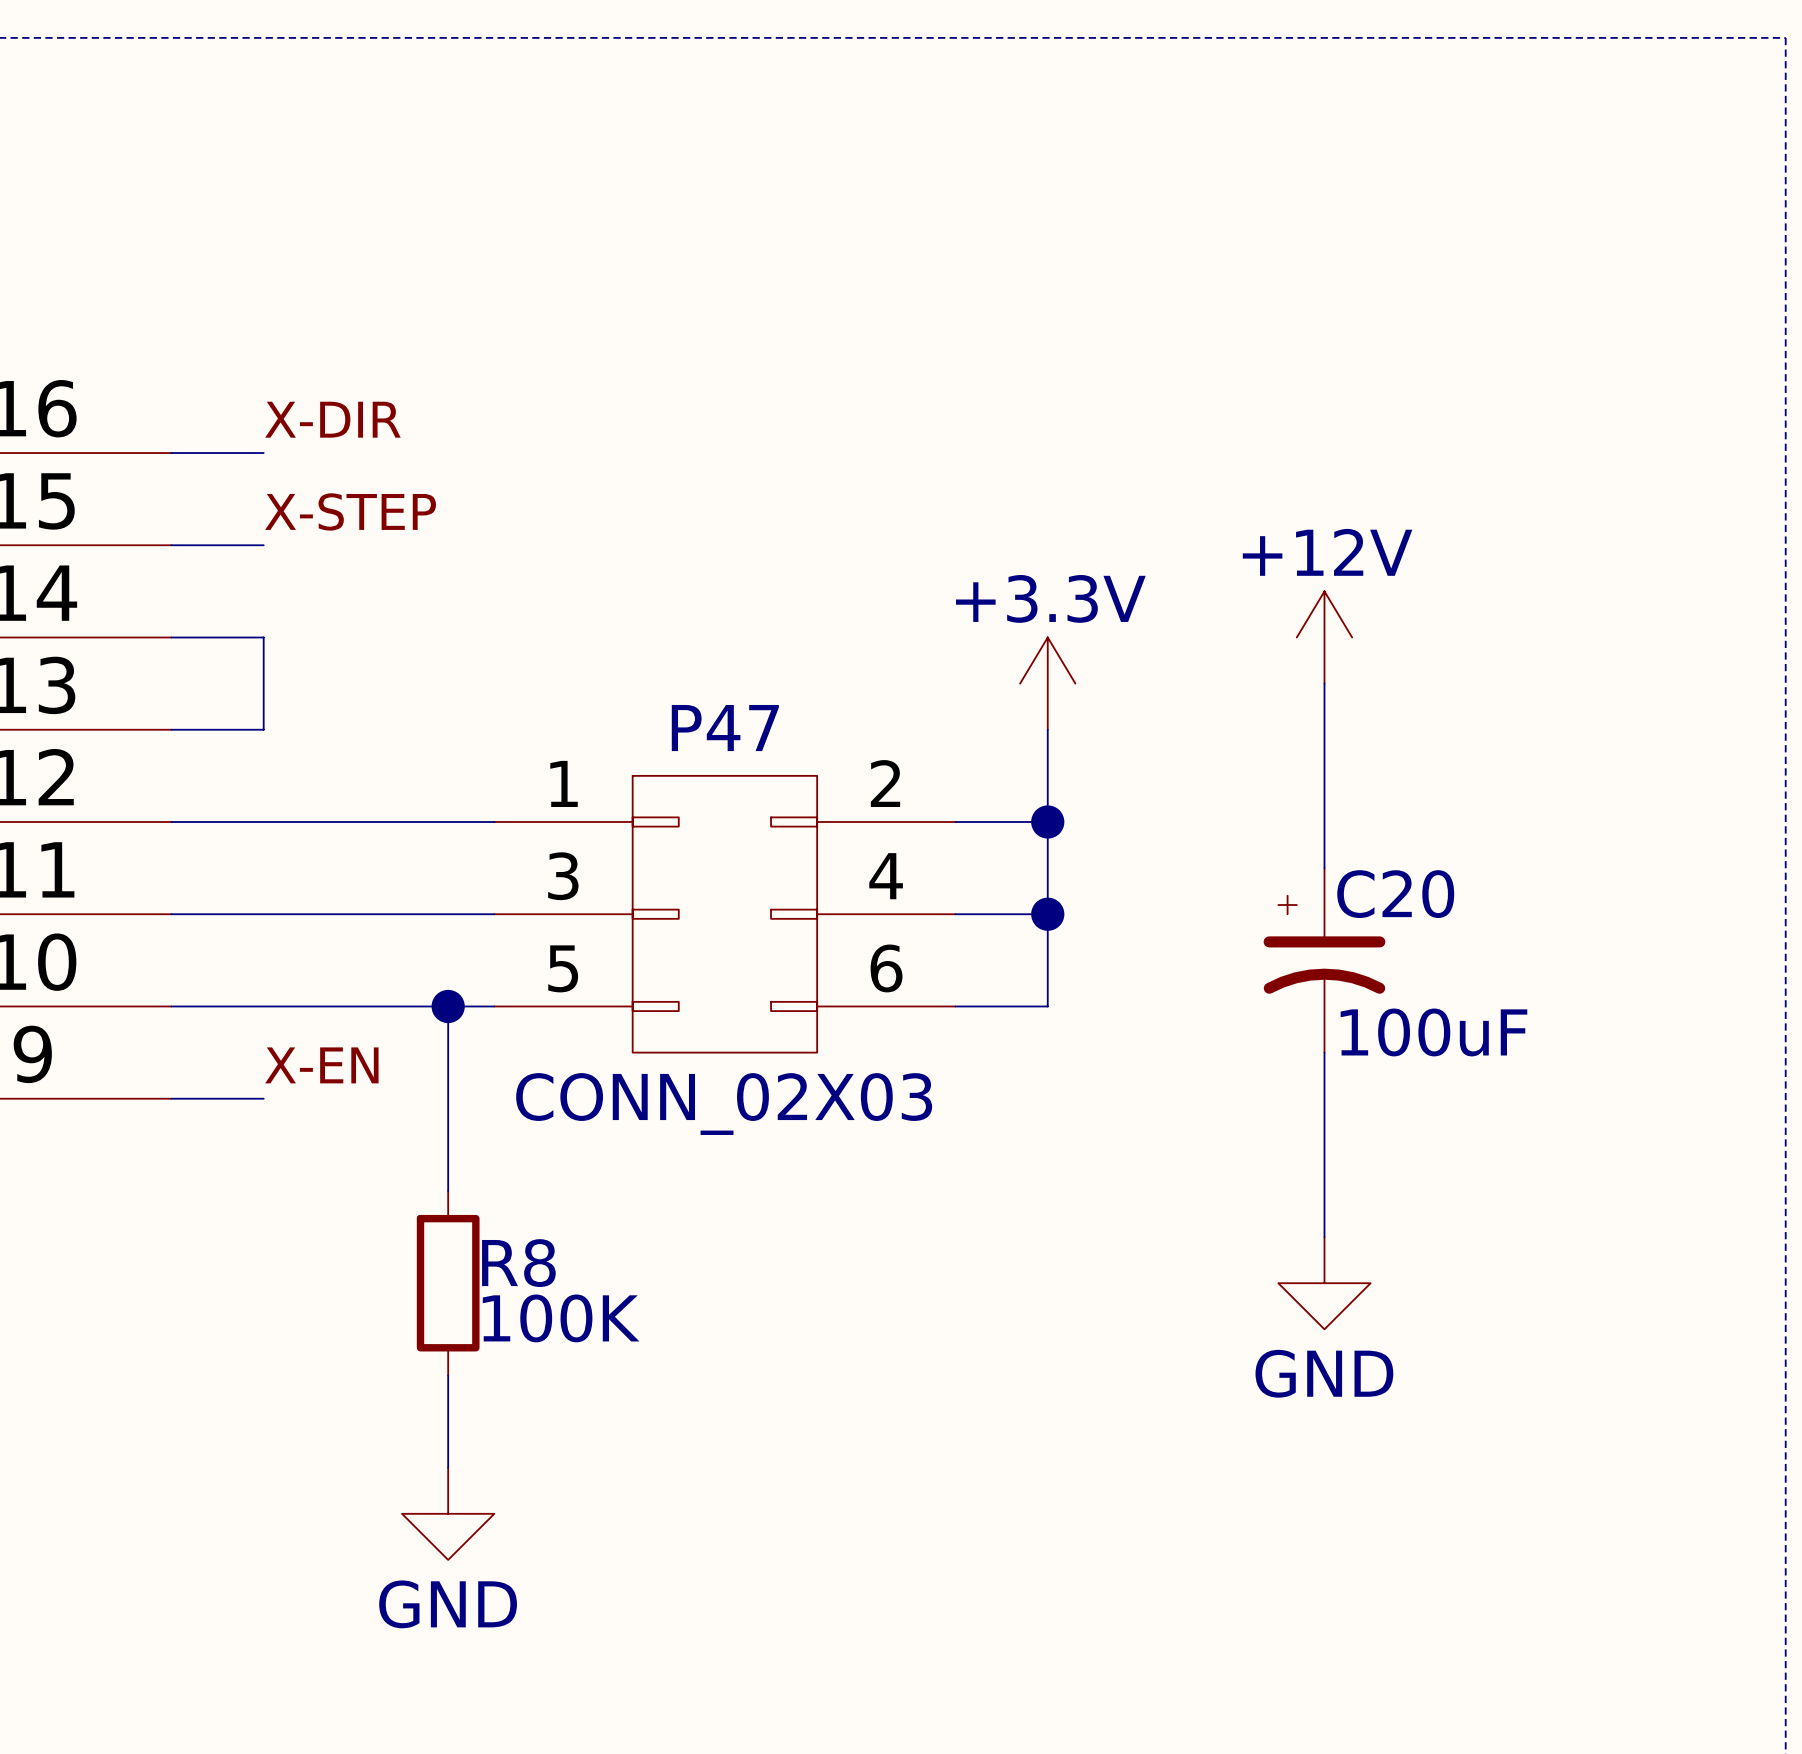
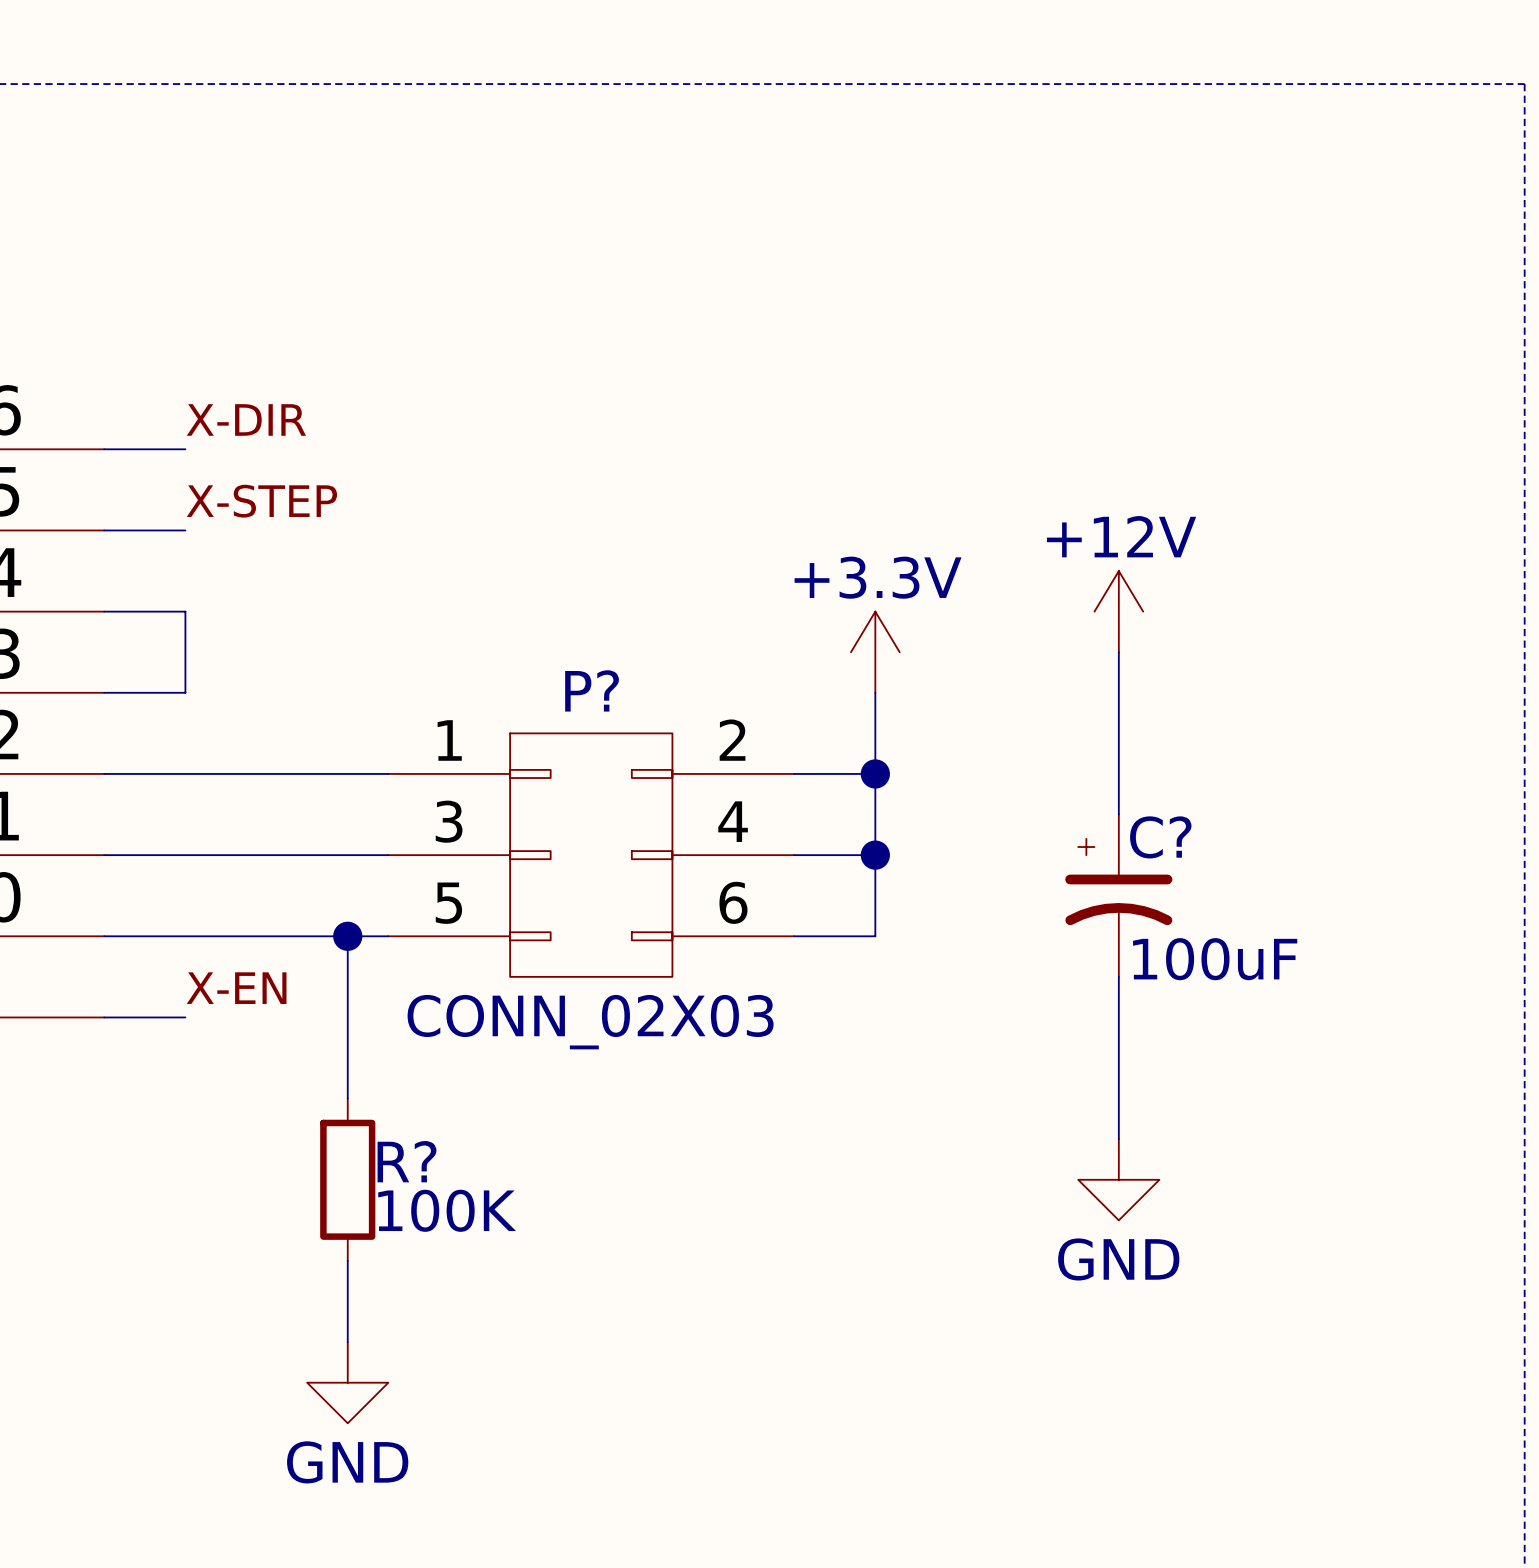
P47 name: P47 (725, 728) -> P? (592, 690)
C20 name: C20 (1395, 894) -> C? (1160, 837)
R8 name: R8 (518, 1263) -> R? (407, 1161)

